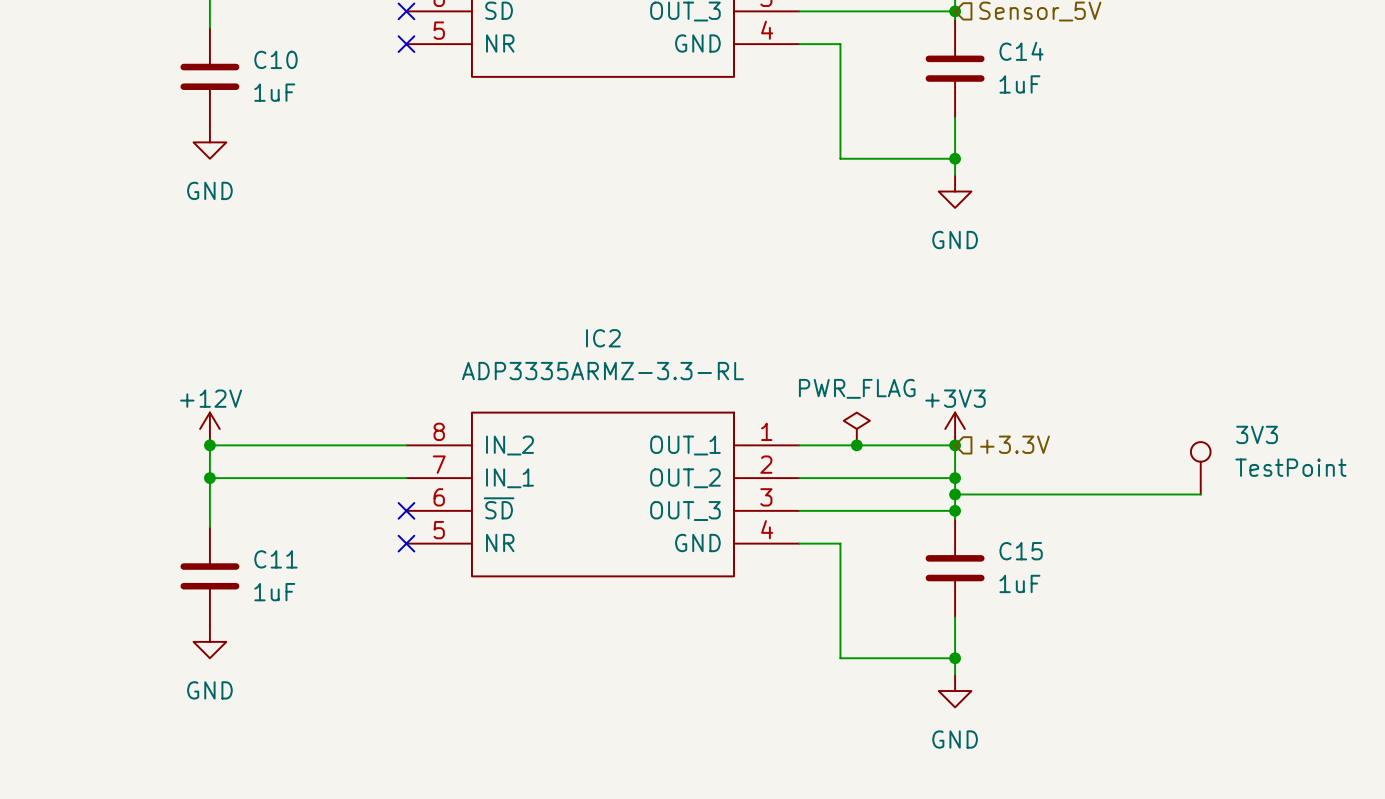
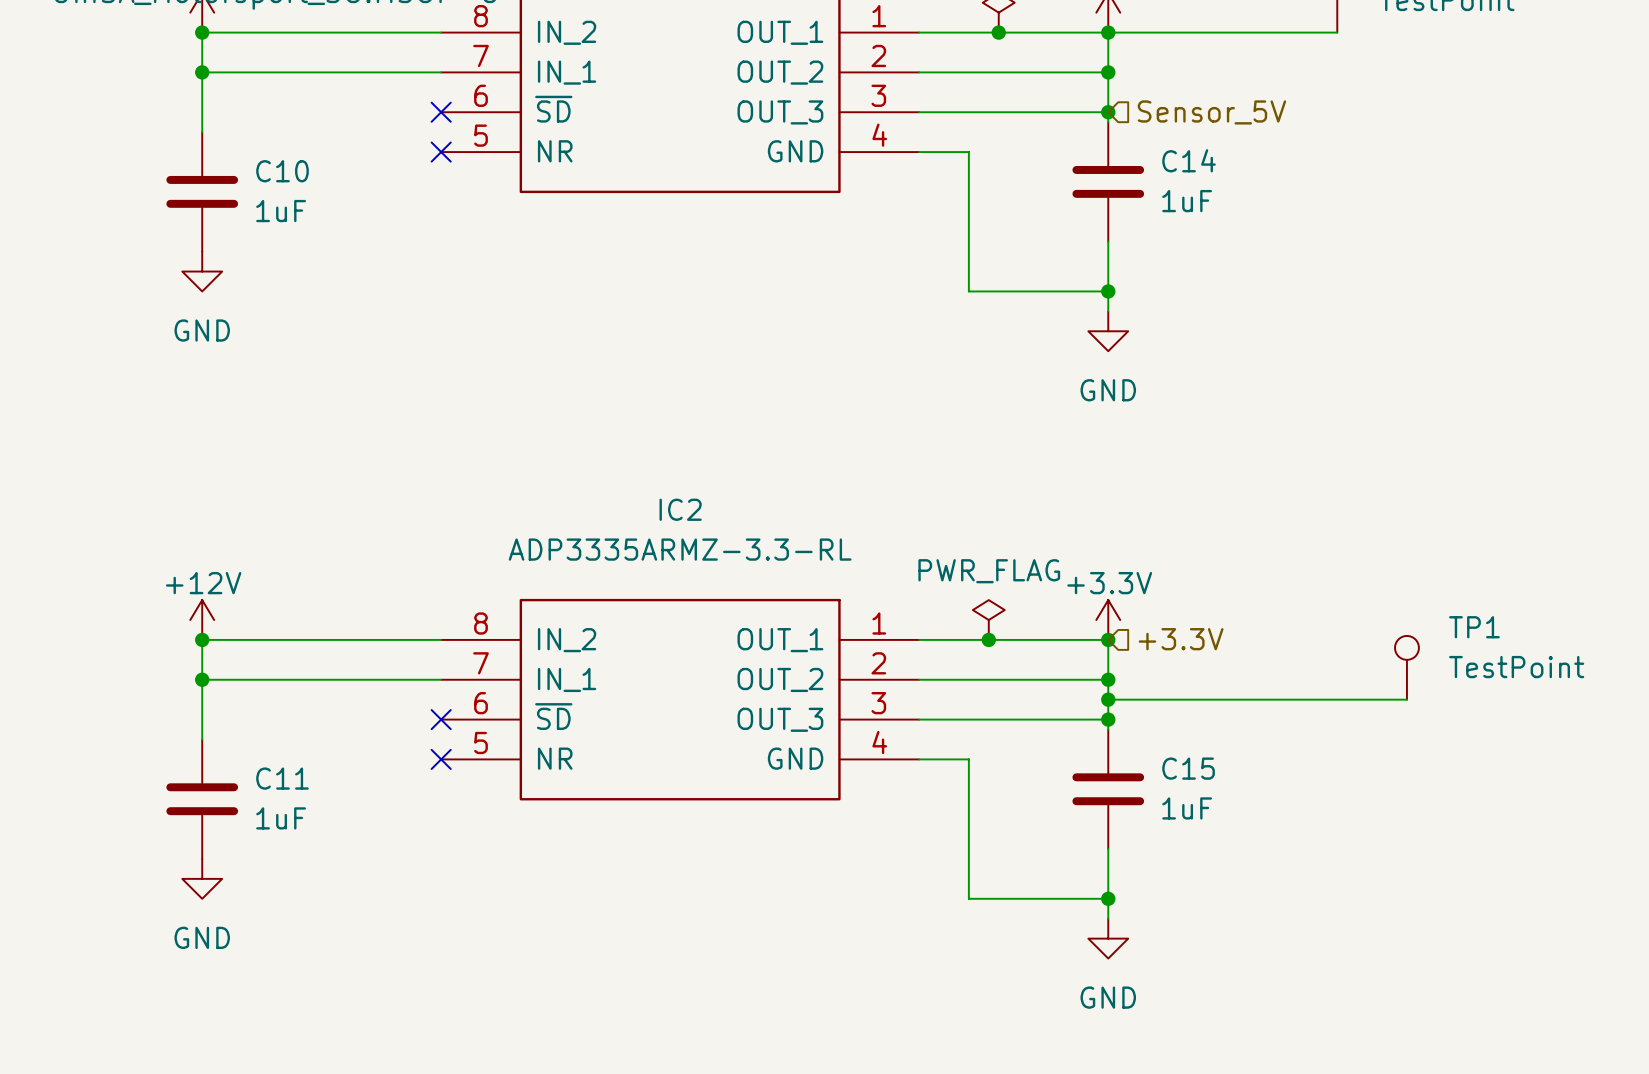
power symbol: +3V3 (955, 428) -> +3.3V (1108, 620)
3V3 name: 3V3 (1257, 434) -> TP1 (1474, 627)

